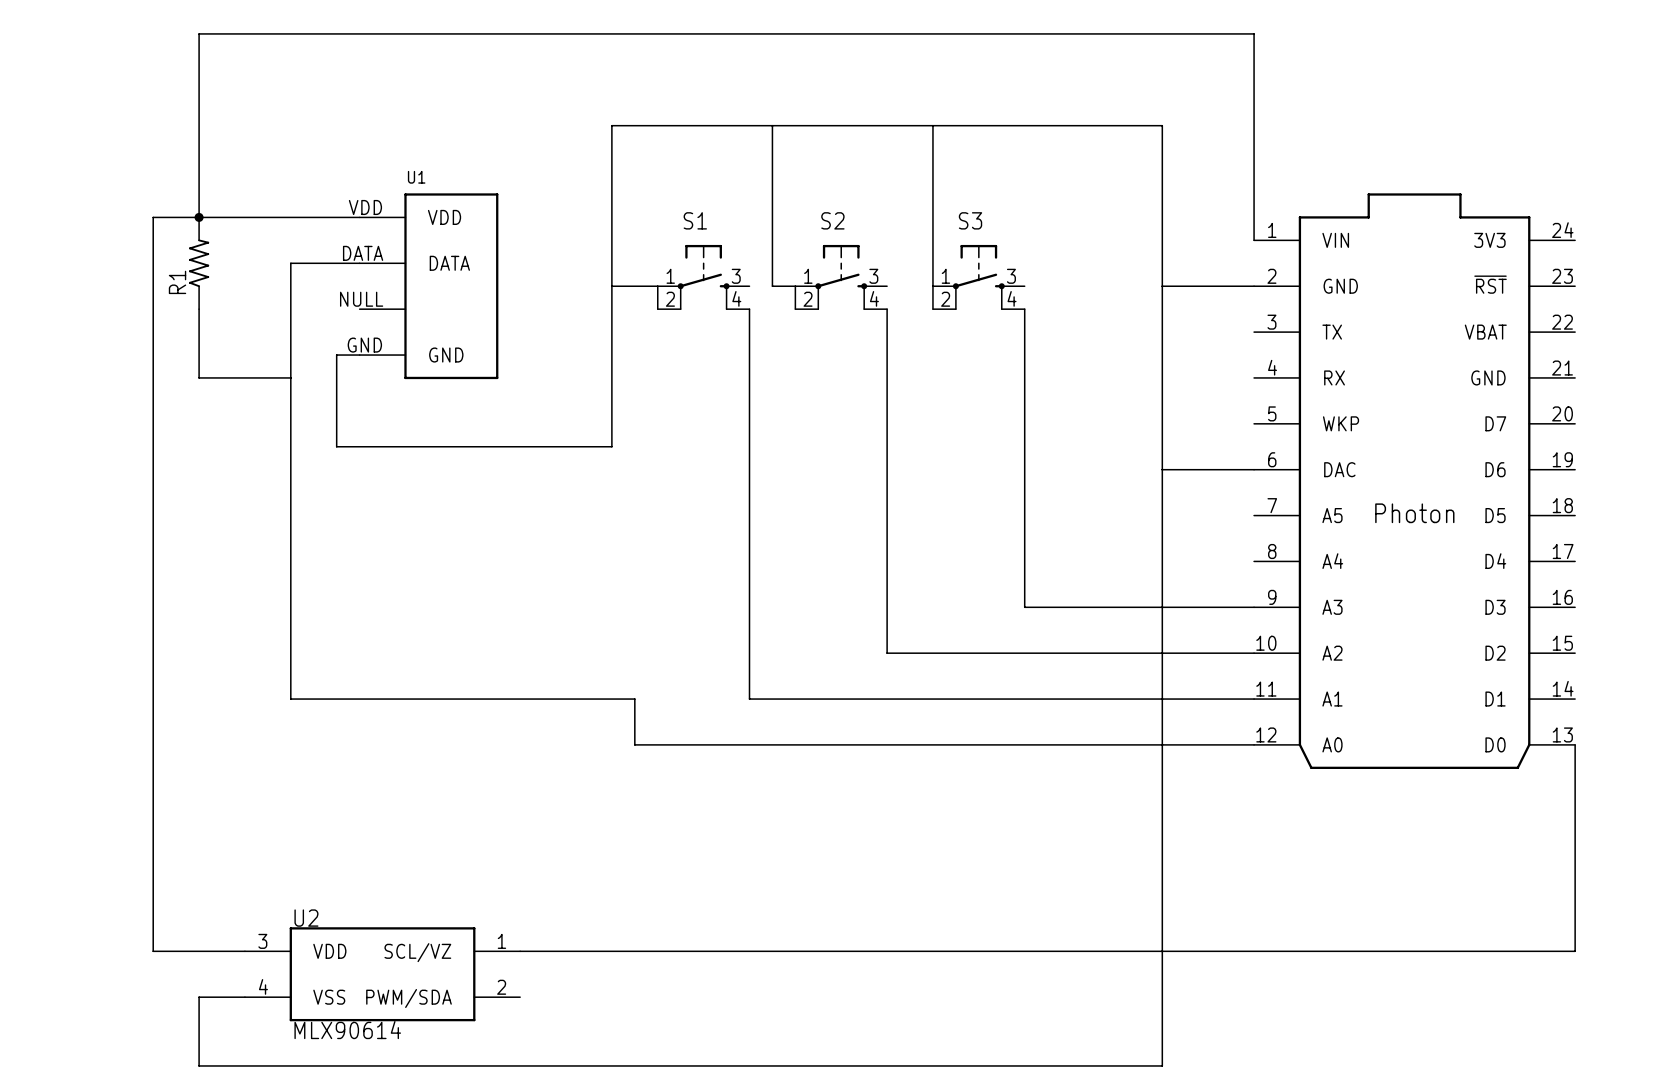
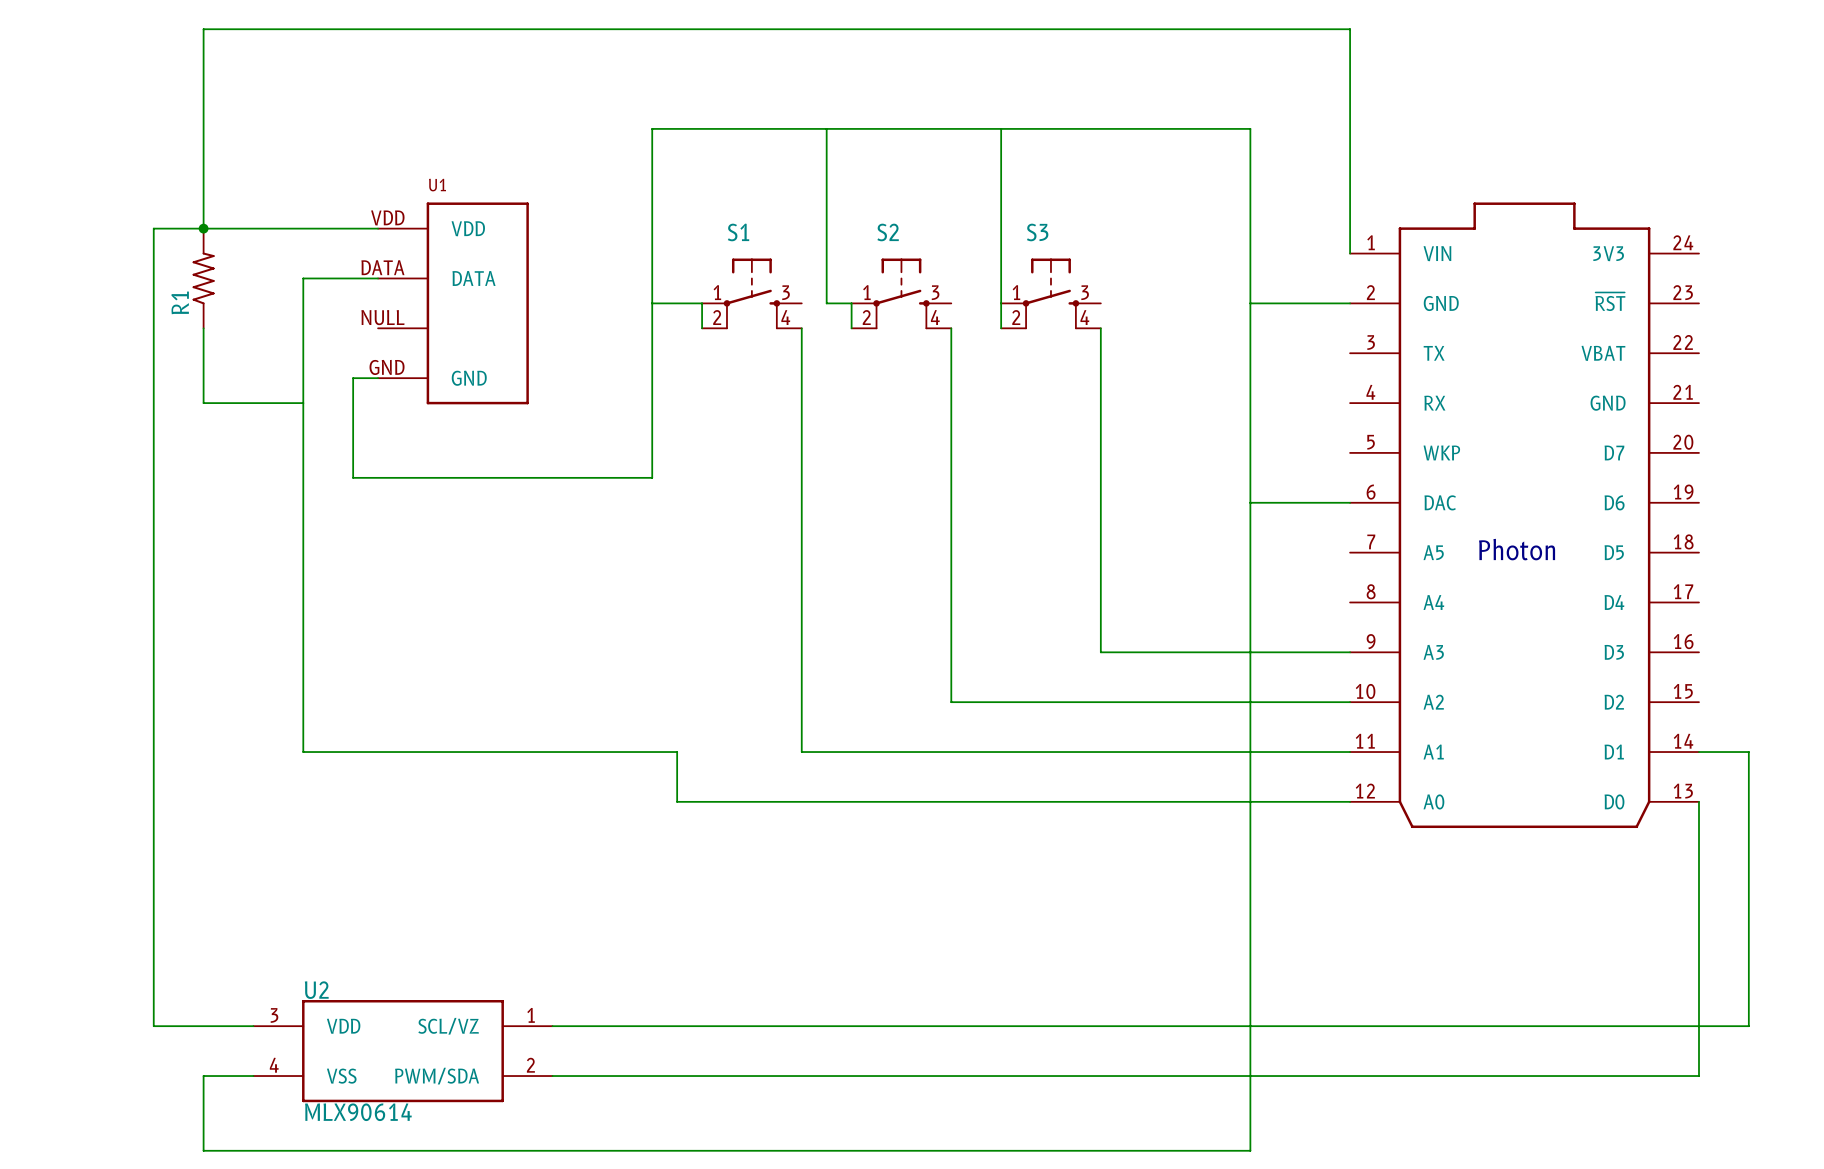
wire: none -> (1698, 752) (1748, 752) (1748, 1026) (1698, 1026) (1698, 1076) (552, 1076)

